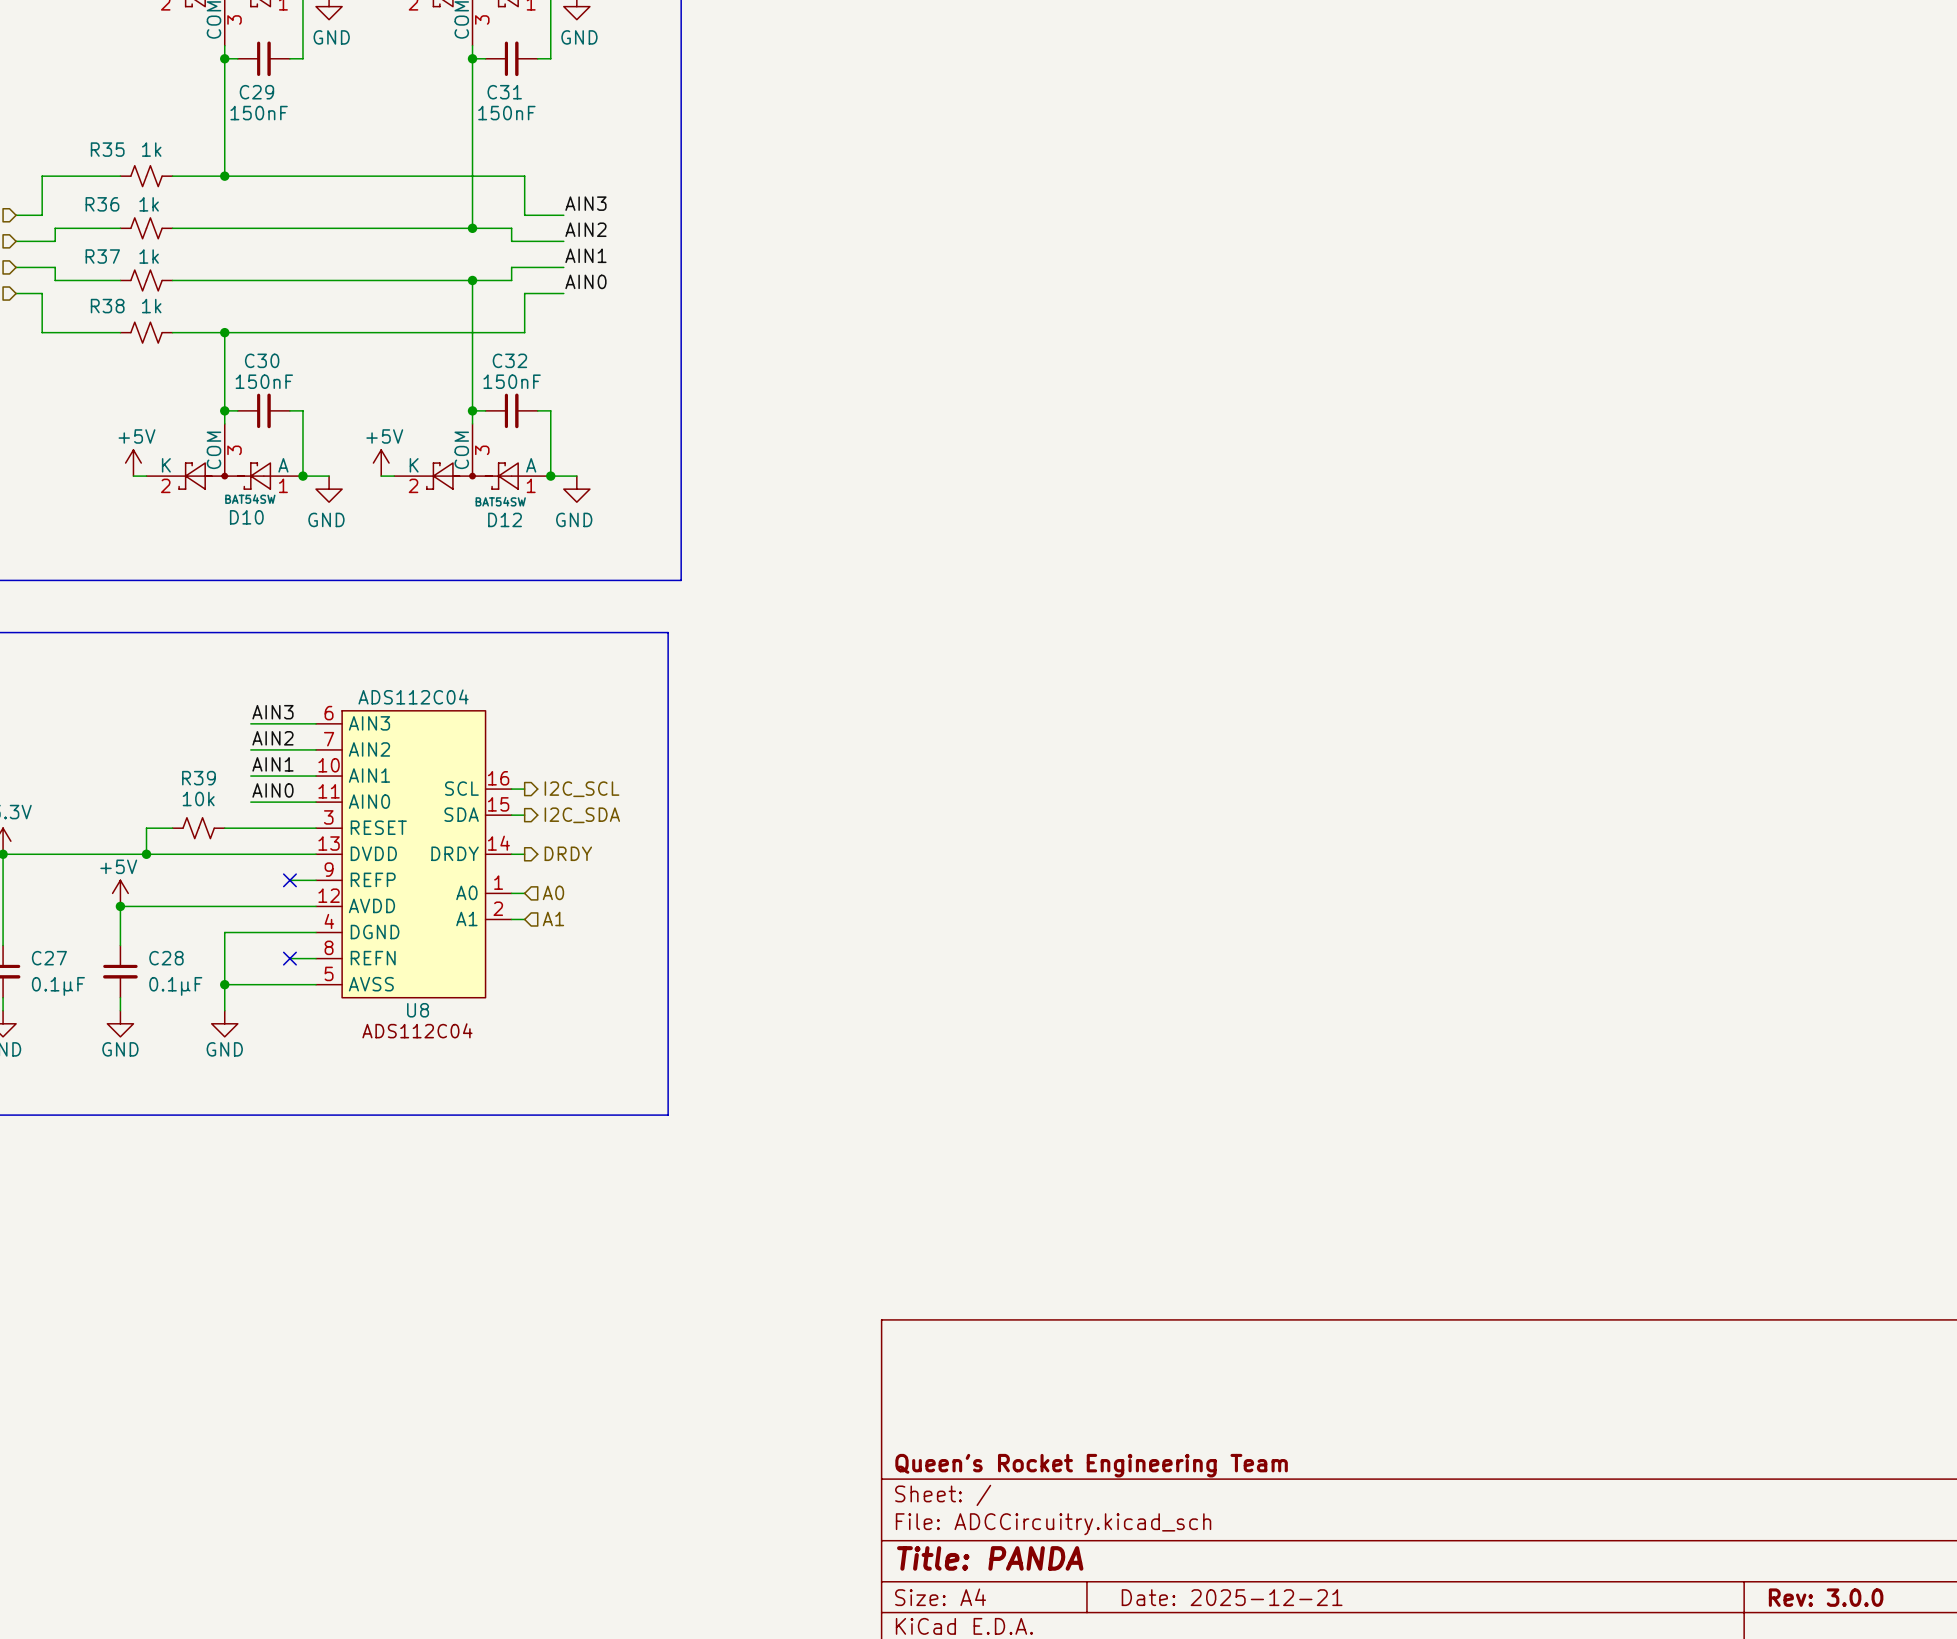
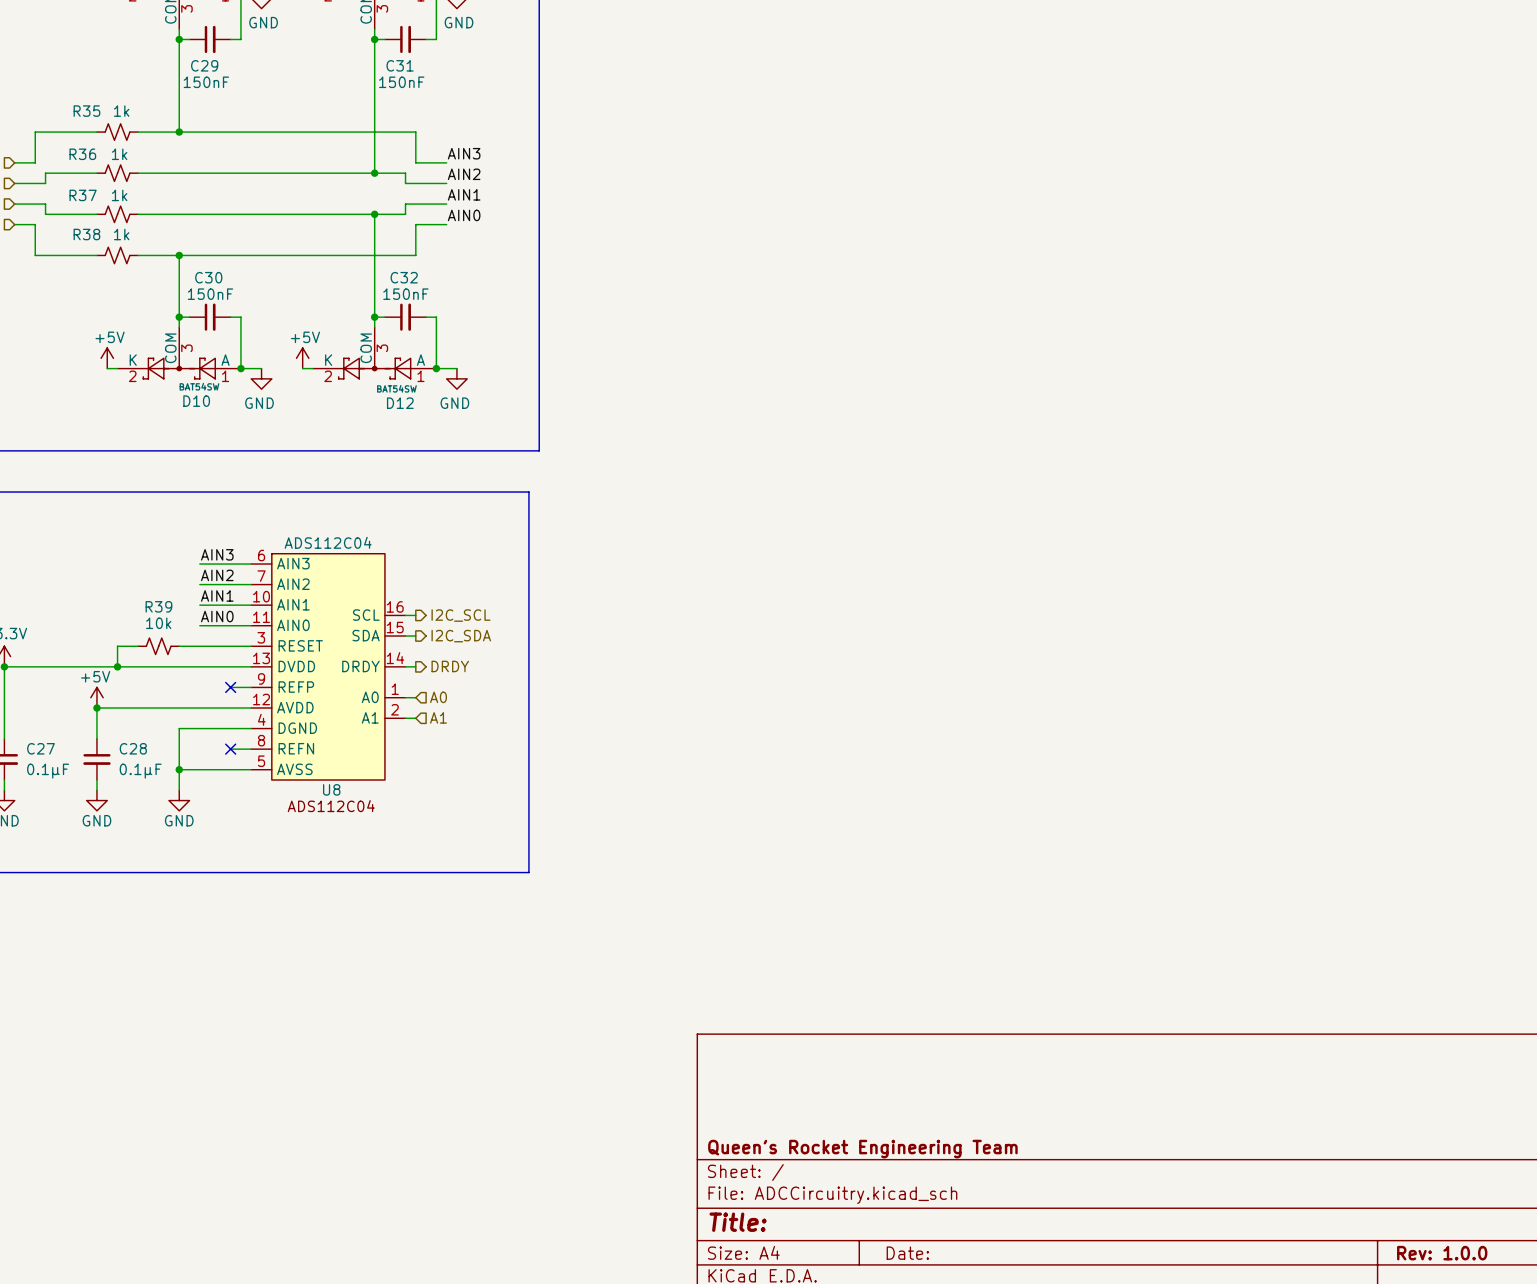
title block: Title: PANDA (990, 1558) -> Title: (738, 1222)
title block: Date: 2025-12-21 (1232, 1597) -> Date: (907, 1253)
title block: Rev: 3.0.0 (1826, 1597) -> Rev: 1.0.0 (1442, 1253)

